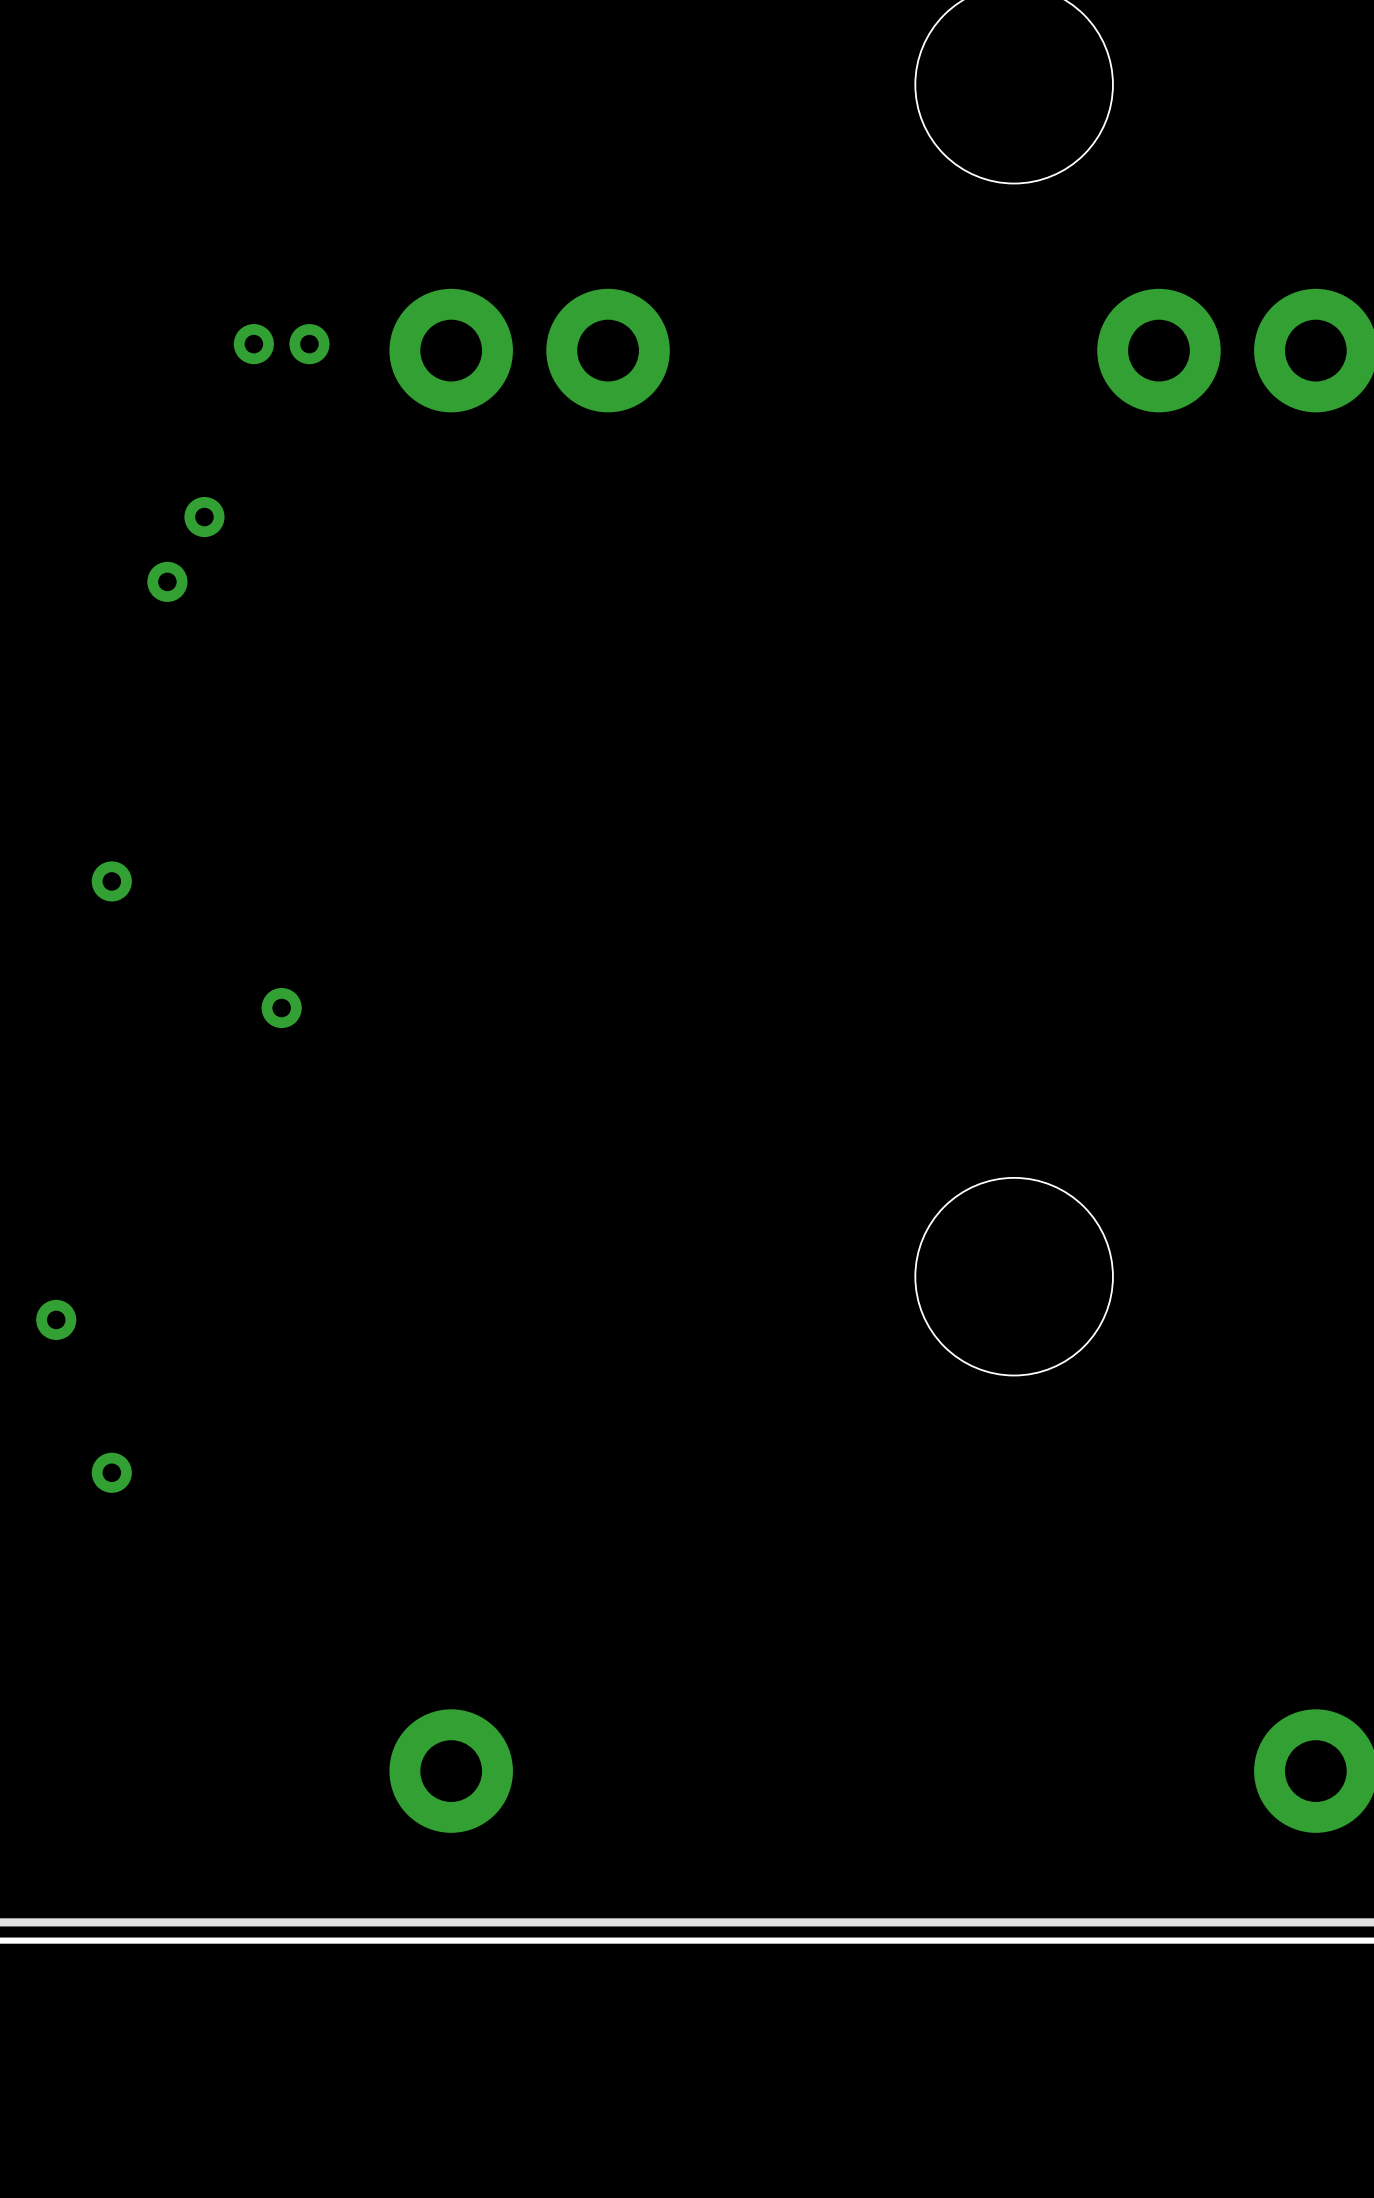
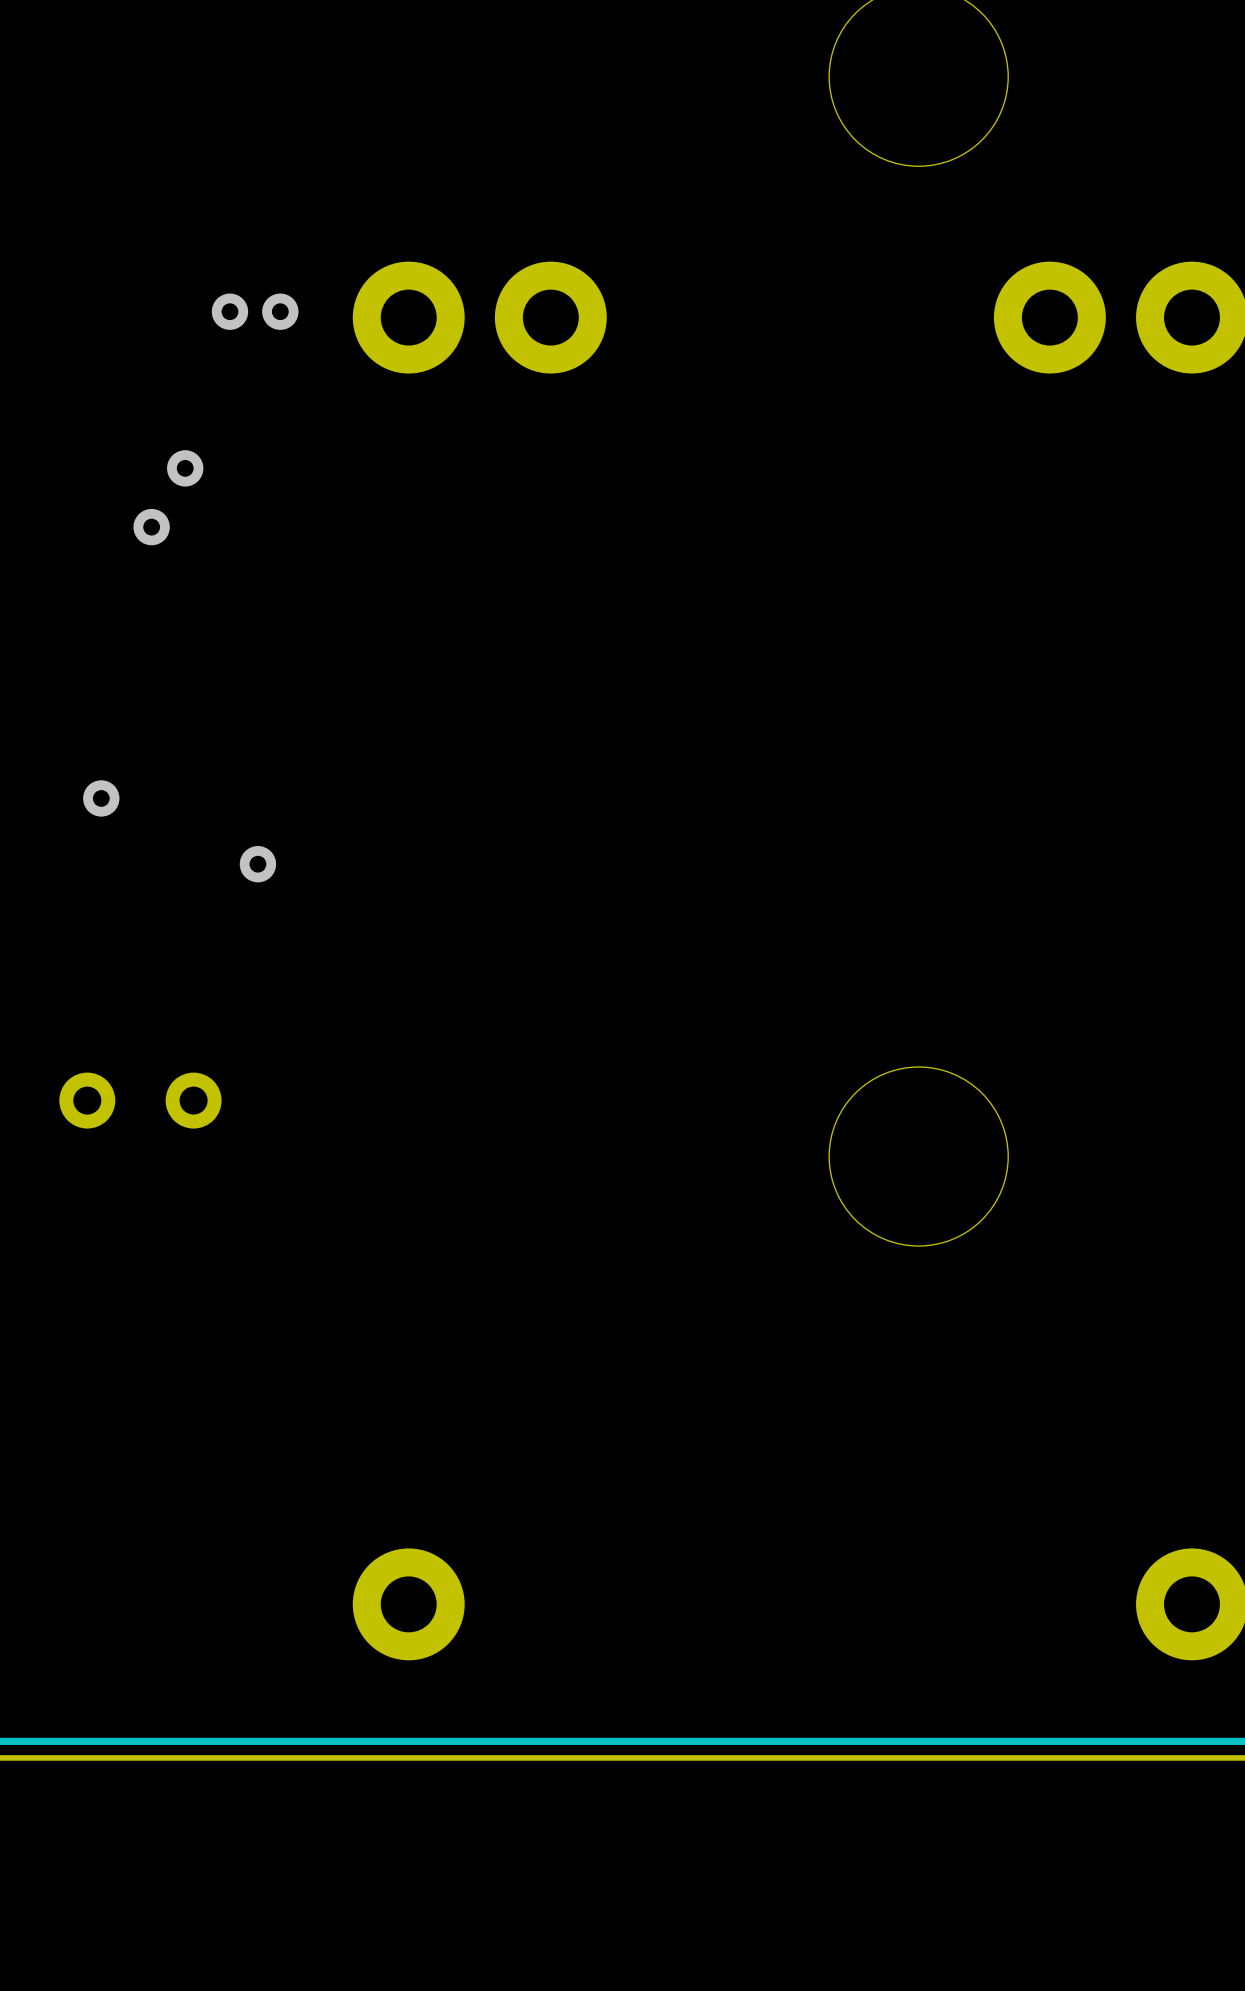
via position: (281, 1008) -> (257, 864)
part: none -> (140, 1100)
via: (56, 1319) -> none
via: (111, 1472) -> none

